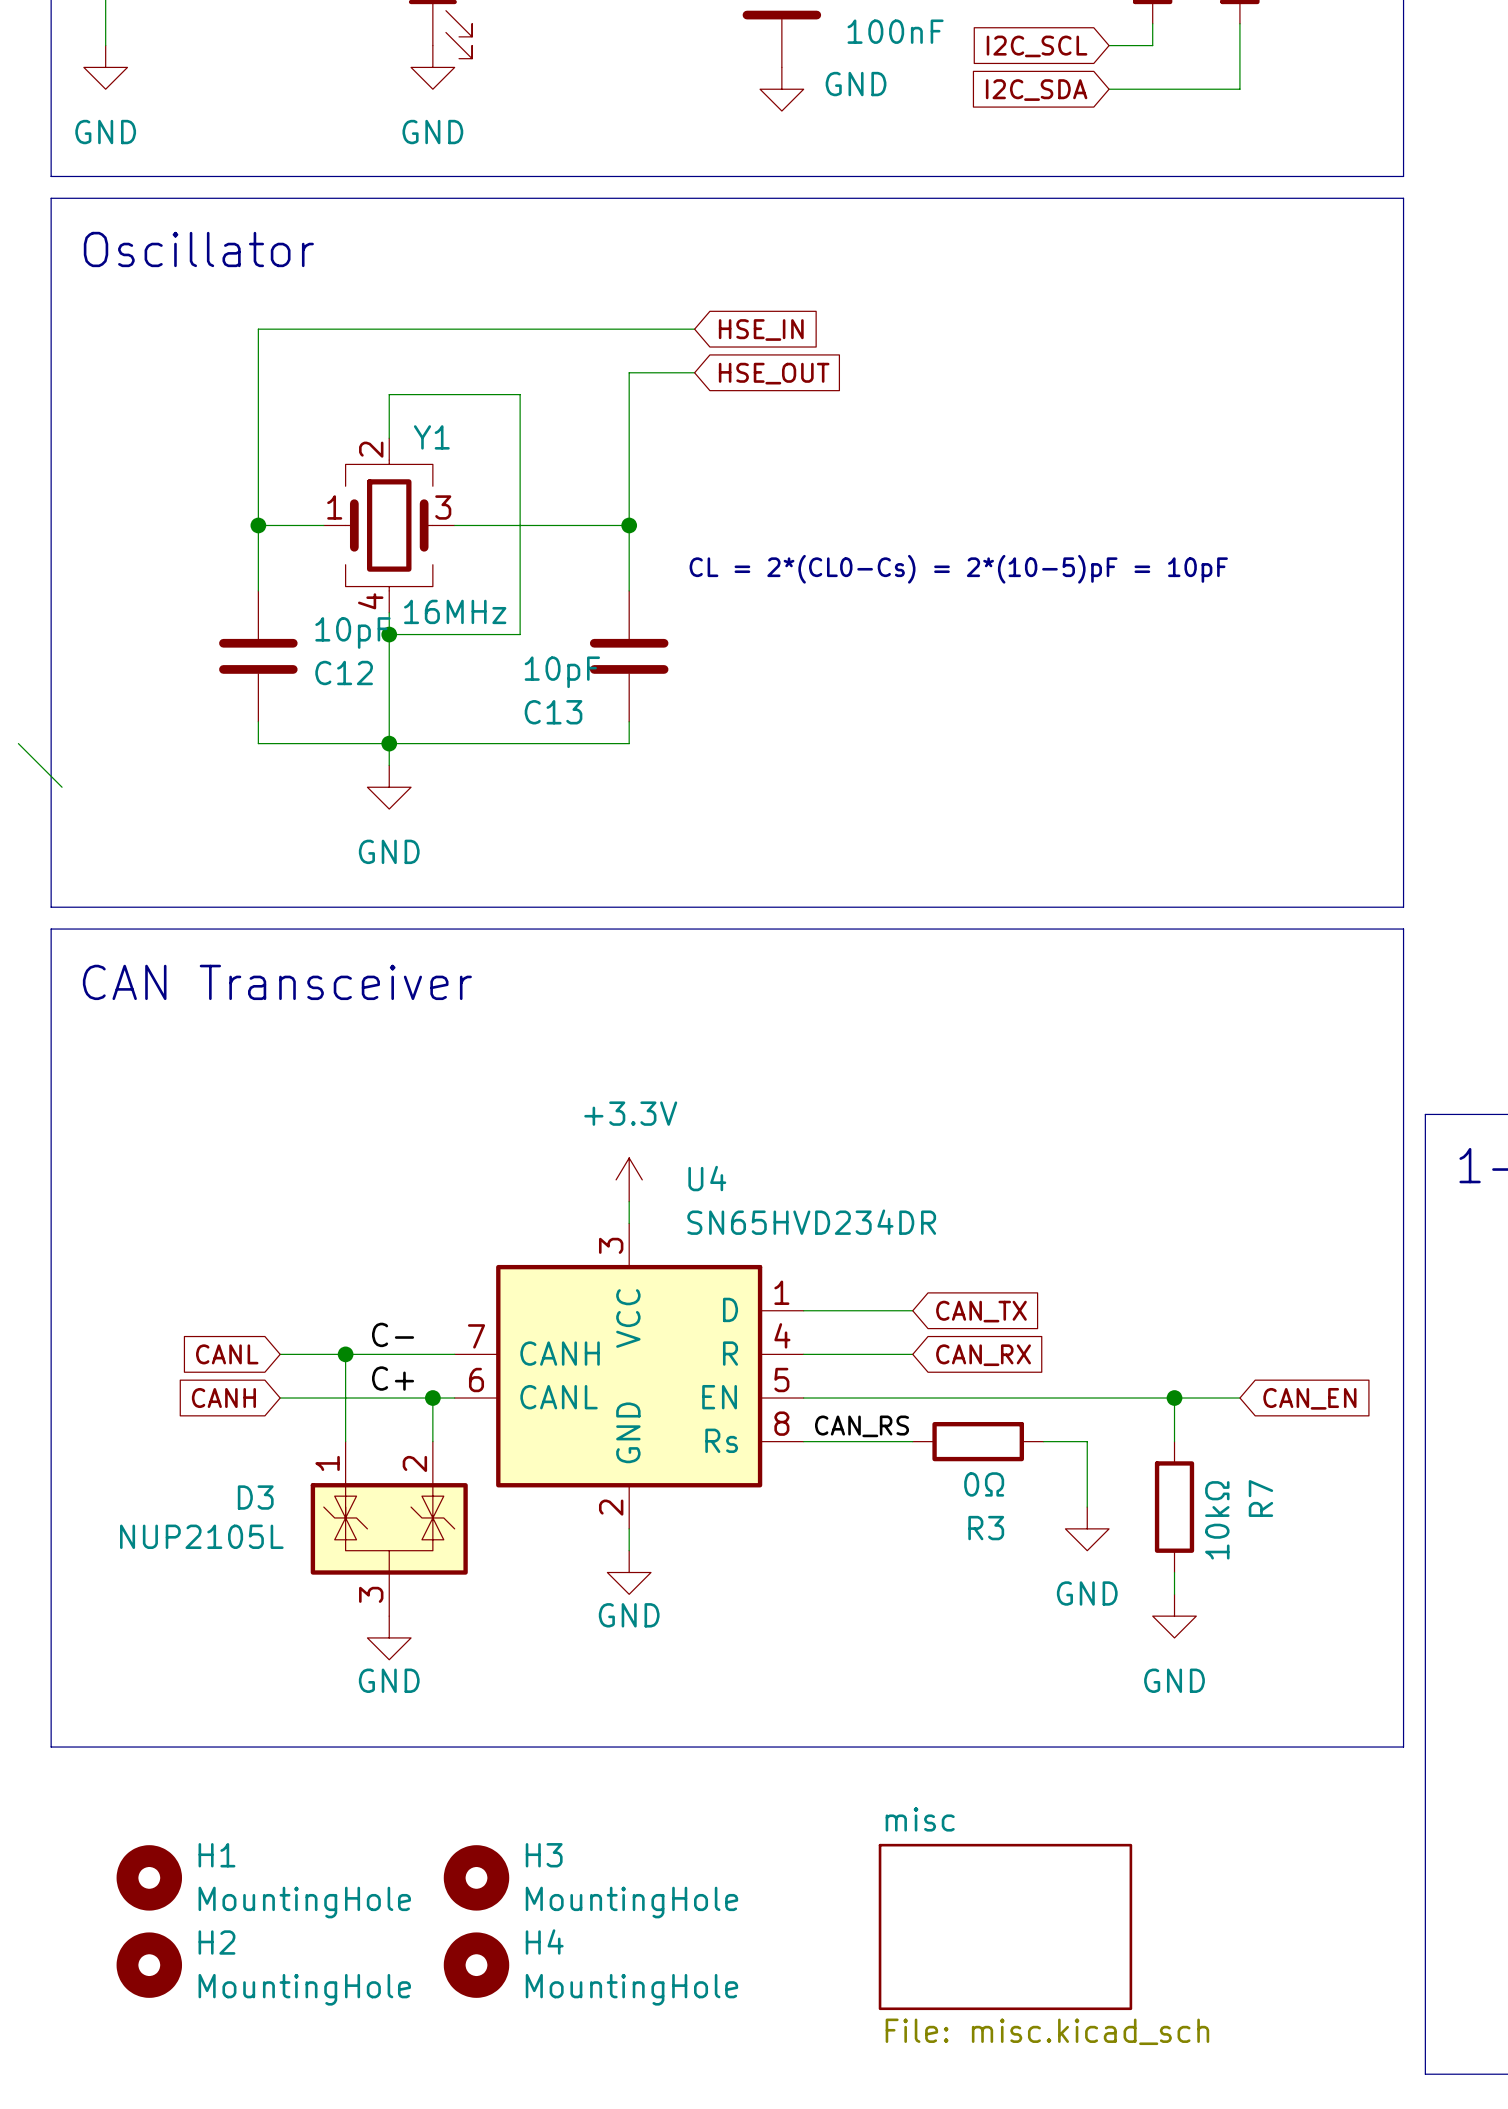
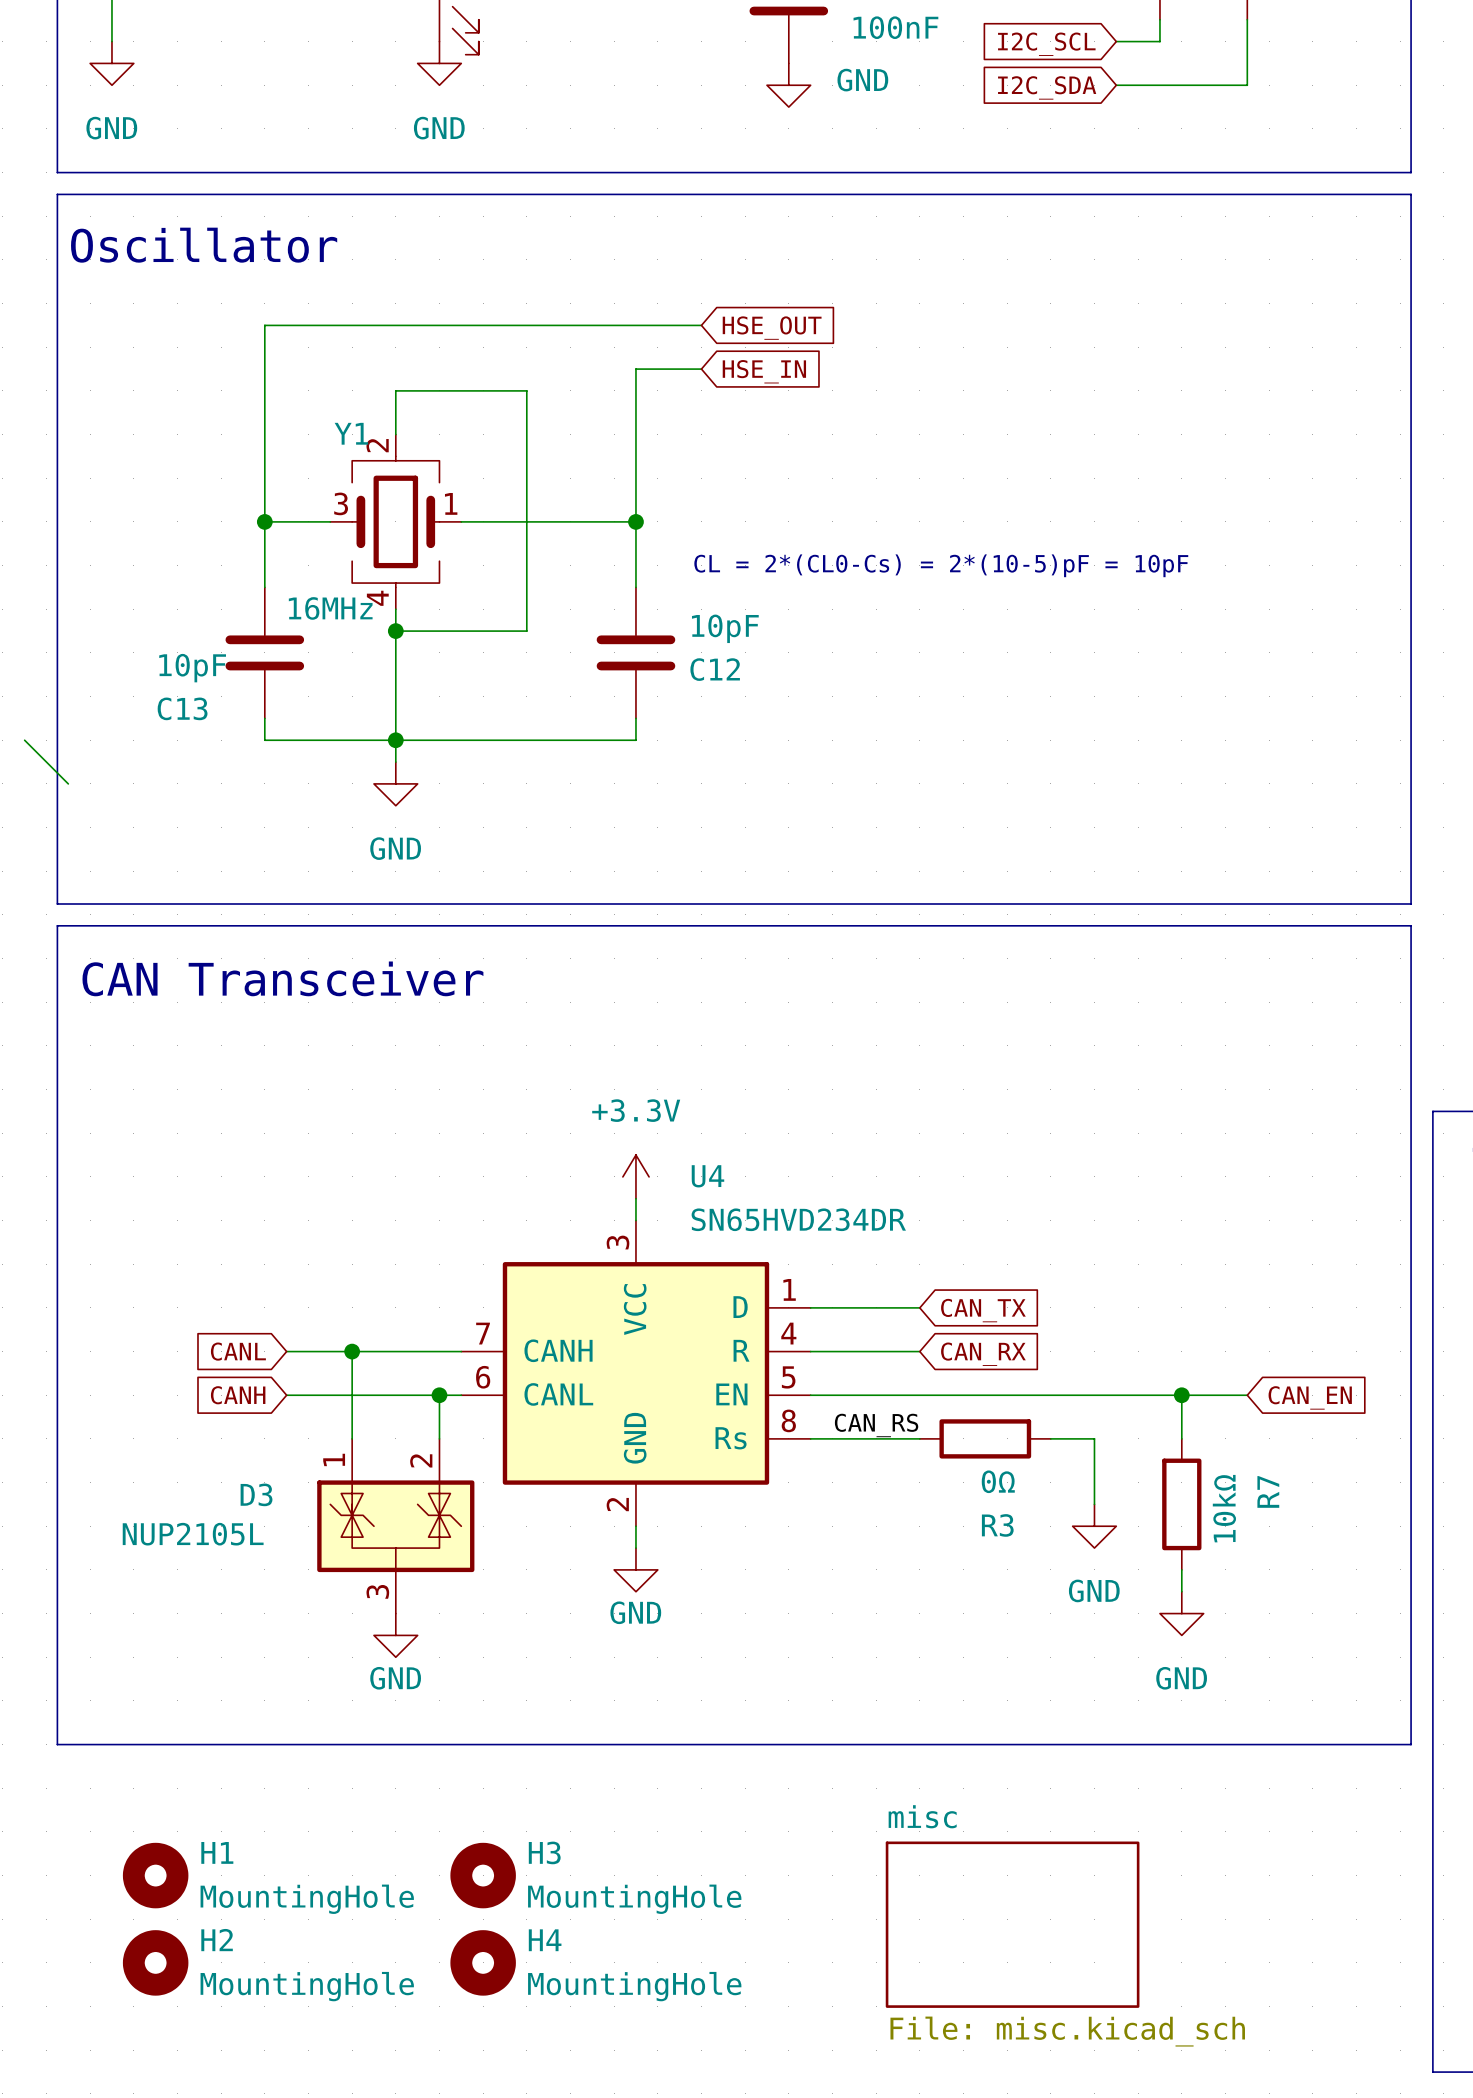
global label: HSE_IN (761, 329) -> HSE_OUT (772, 328)
global label: HSE_OUT (774, 373) -> HSE_IN (764, 371)
Y1 flip: as is (389, 525) -> left-right (395, 521)
C12 value position: 10pF (352, 633) -> 10pF (192, 668)
C12 name: C12 (344, 672) -> C13 (182, 708)
C13 value position: 10pF (562, 672) -> 10pF (725, 628)
C13 name: C13 (553, 712) -> C12 (715, 669)
label: C- (393, 1334) -> none
label: C+ (393, 1378) -> none

